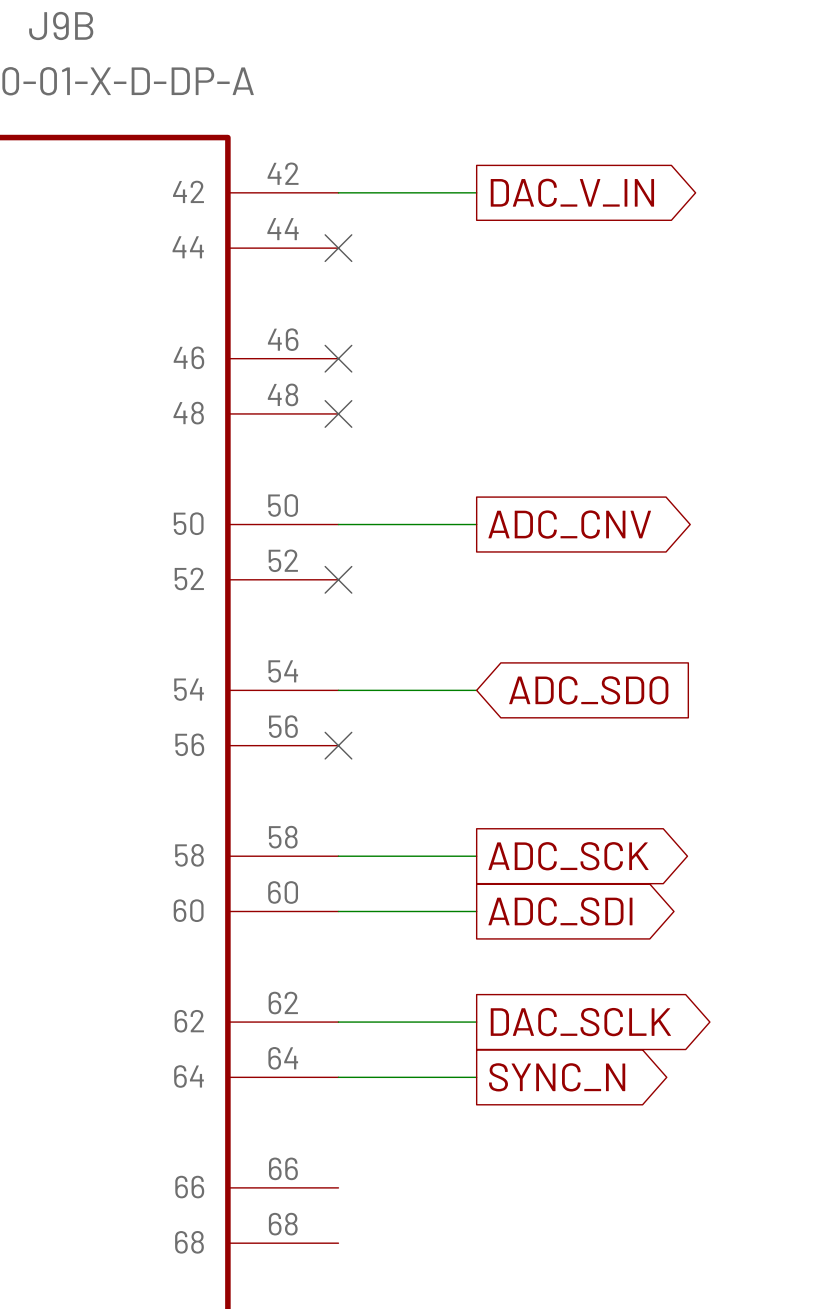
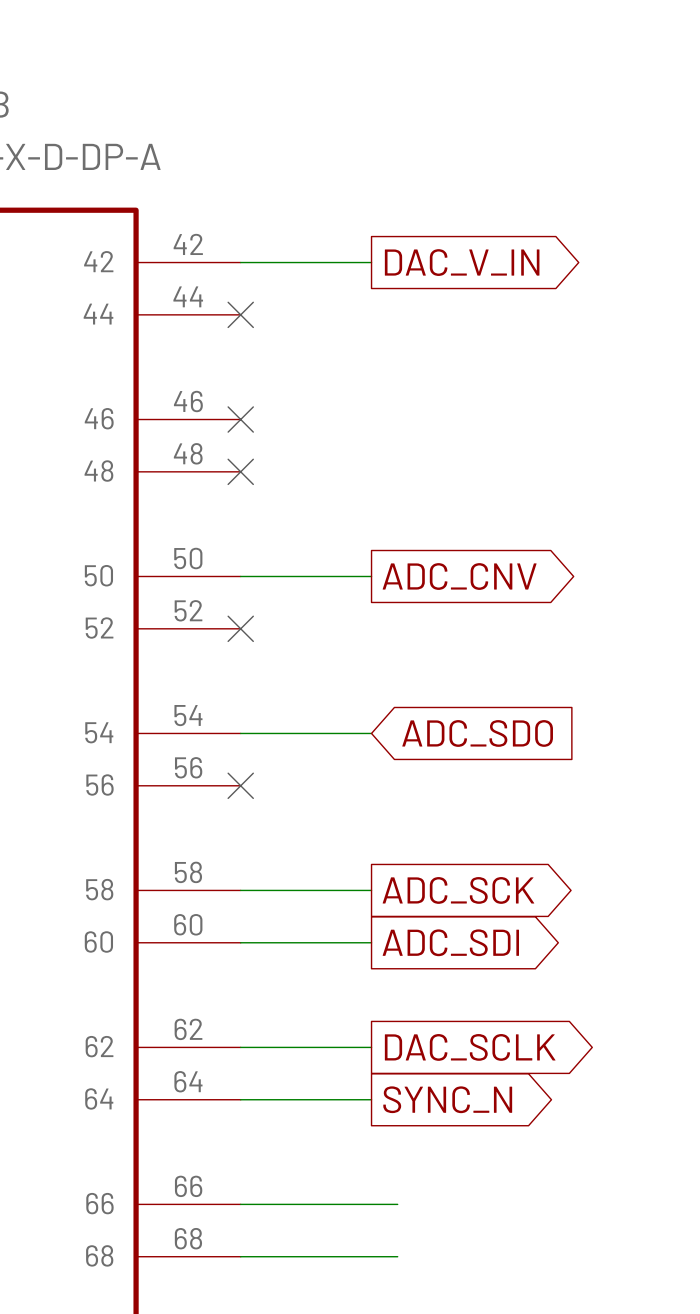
wire: none -> (240, 1204) (397, 1204)
wire: none -> (240, 1256) (397, 1256)

